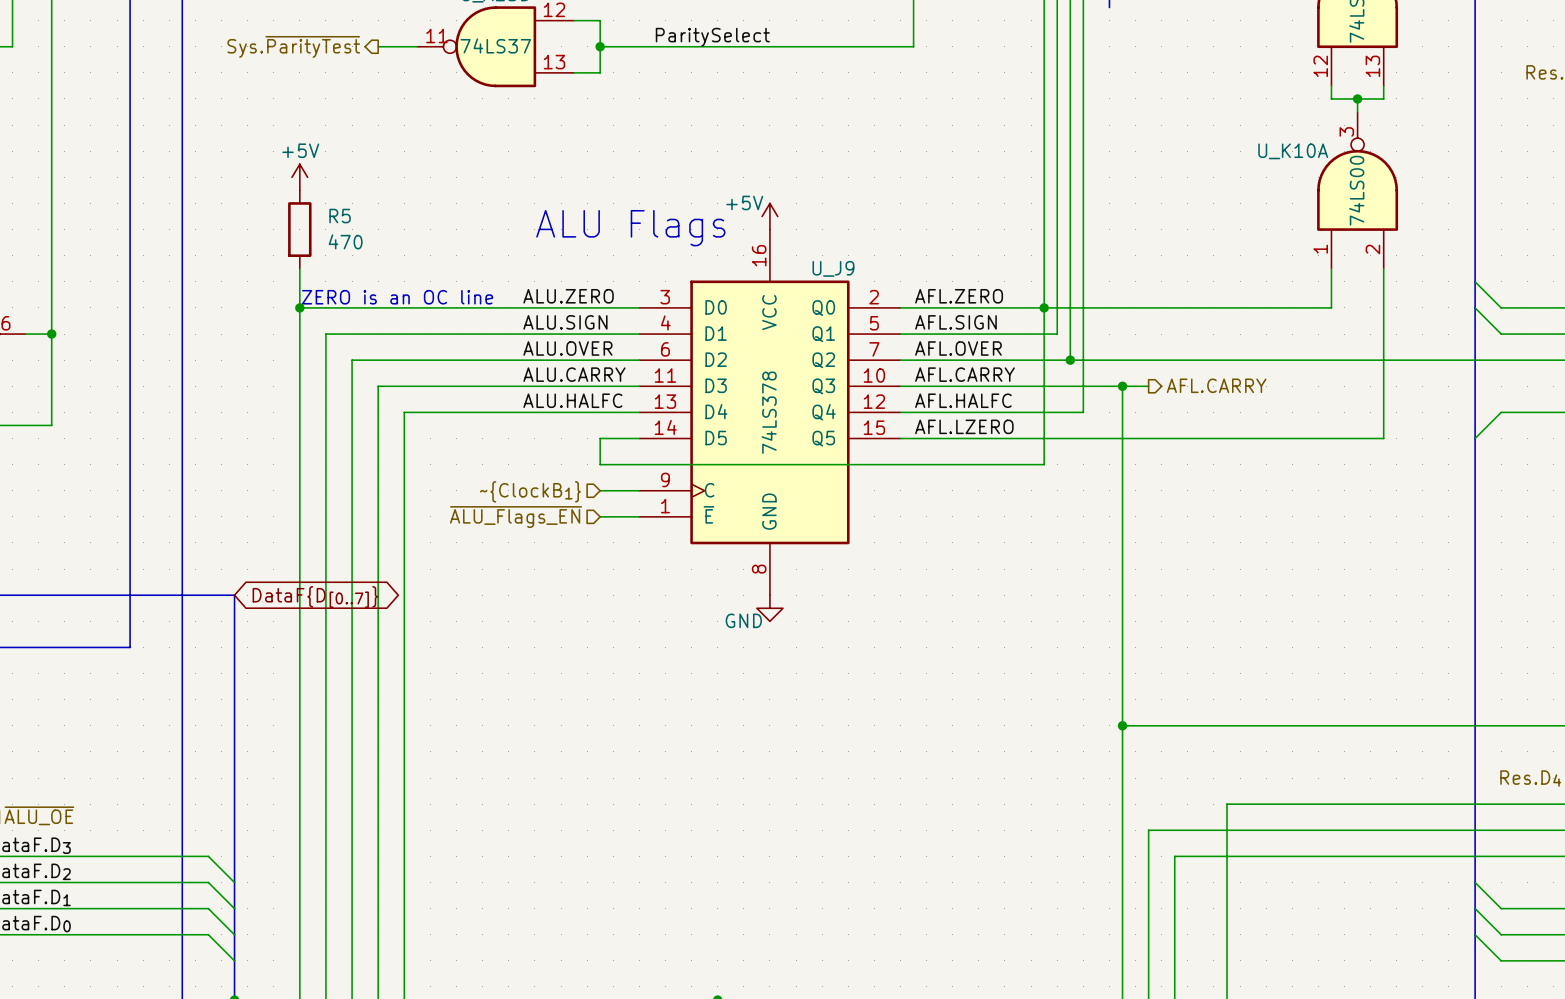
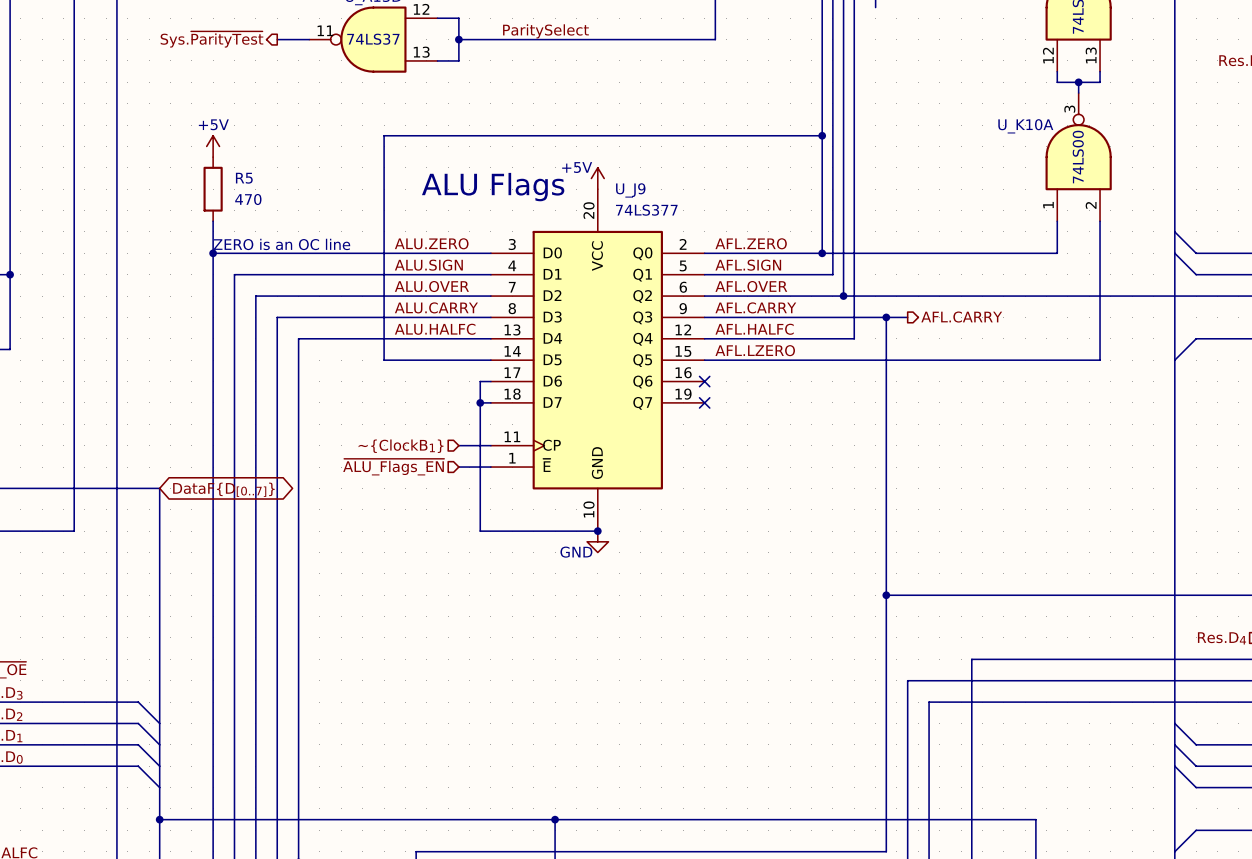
wire: none -> (822, 135) (384, 135) (384, 360) (458, 360)
junction: none -> (822, 135)
U_J9 symbol: [639, 229, 901, 596] -> [490, 189, 705, 532]
U_J9 name position: U_J9 (833, 268) -> U_J9 (630, 190)
wire: (1044, 307) (1044, 464) (639, 464) -> none
U_J9 value: 74LS378 (769, 412) -> 74LS377 (646, 210)
wire: (600, 438) (600, 464) (626, 464) -> (597, 531) (480, 531) (480, 381)
no-connect mark: none -> (704, 381)
wire: (600, 490) (626, 490) -> none
junction: none -> (480, 402)
no-connect mark: none -> (704, 402)
hierarchical label position: ~{ClockB1} (530, 491) -> ~{ClockB1} (401, 446)
wire: (600, 516) (639, 516) -> (458, 445) (490, 445)
hierarchical label position: ~{ALU_Flags_EN} (515, 517) -> ~{ALU_Flags_EN} (393, 467)
wire: none -> (458, 467) (490, 467)
power symbol position: GND (769, 608) -> GND (597, 541)
junction: none -> (597, 531)

